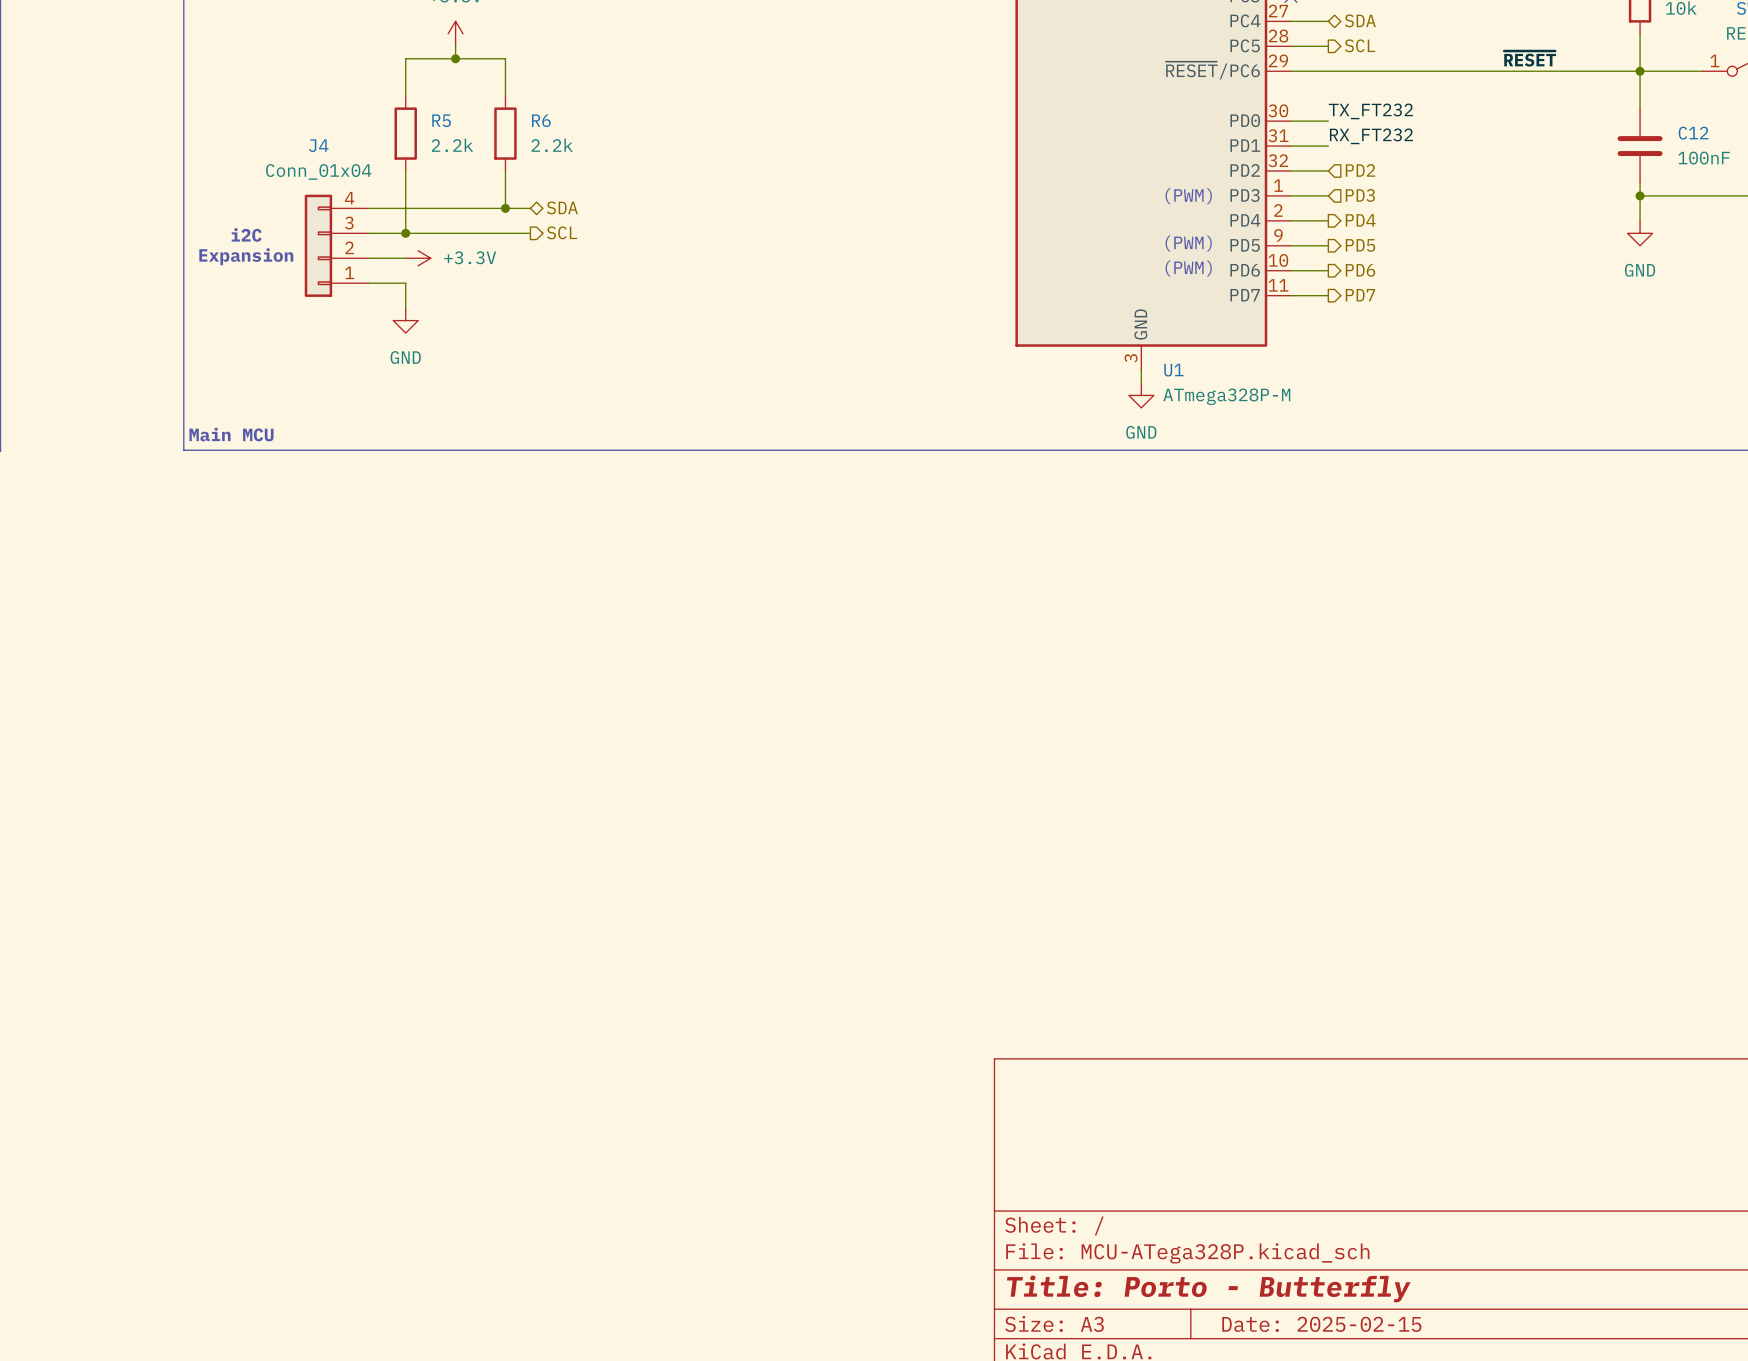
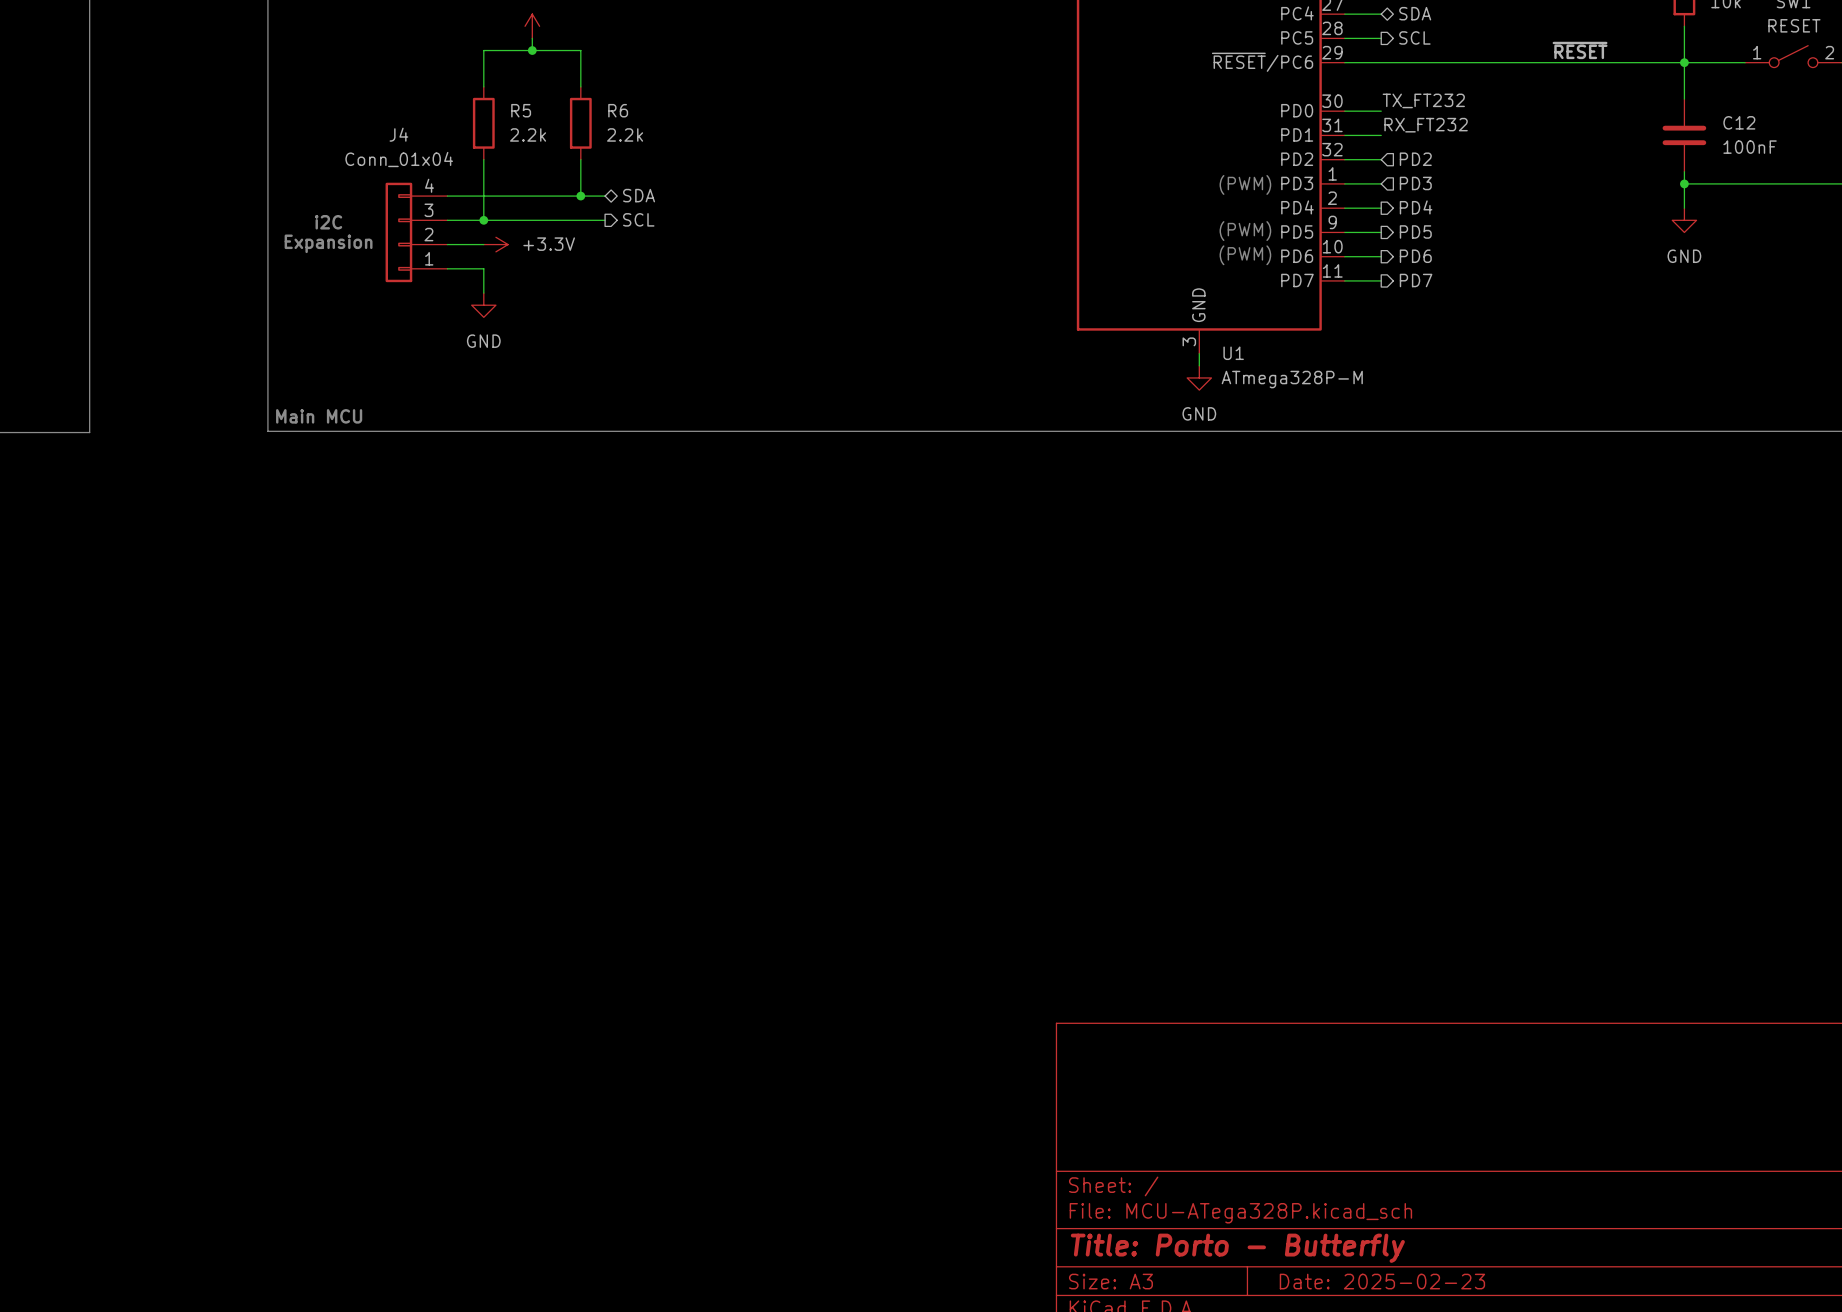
title block: Date: 2025-02-15 (1321, 1324) -> Date: 2025-02-23 (1382, 1281)

